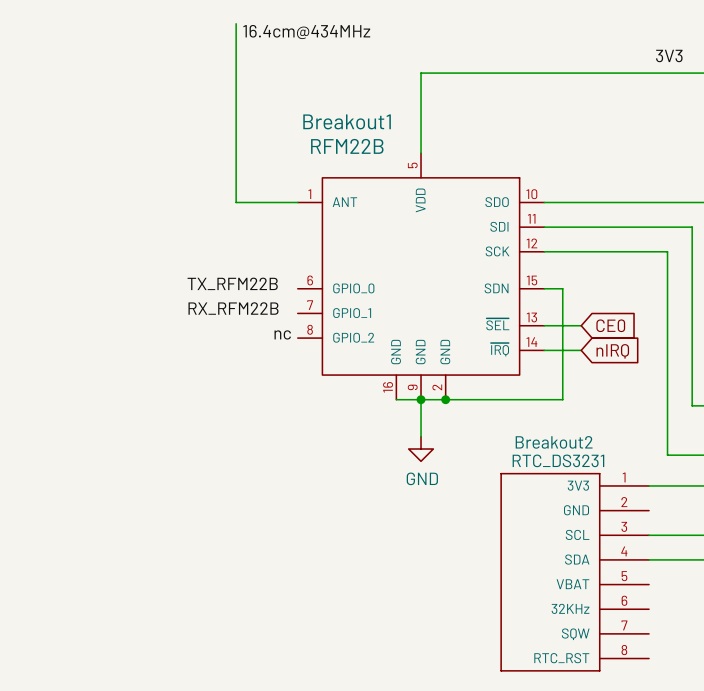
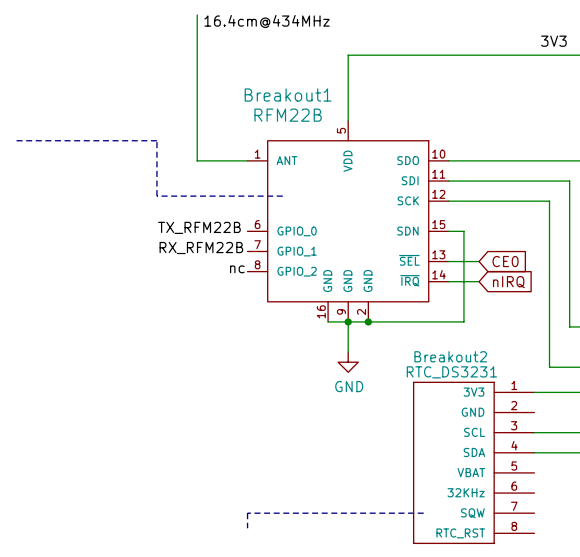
line: none -> (16, 140) (156, 140) (156, 196) (282, 196)
line: none -> (423, 513) (247, 513) (247, 528)

